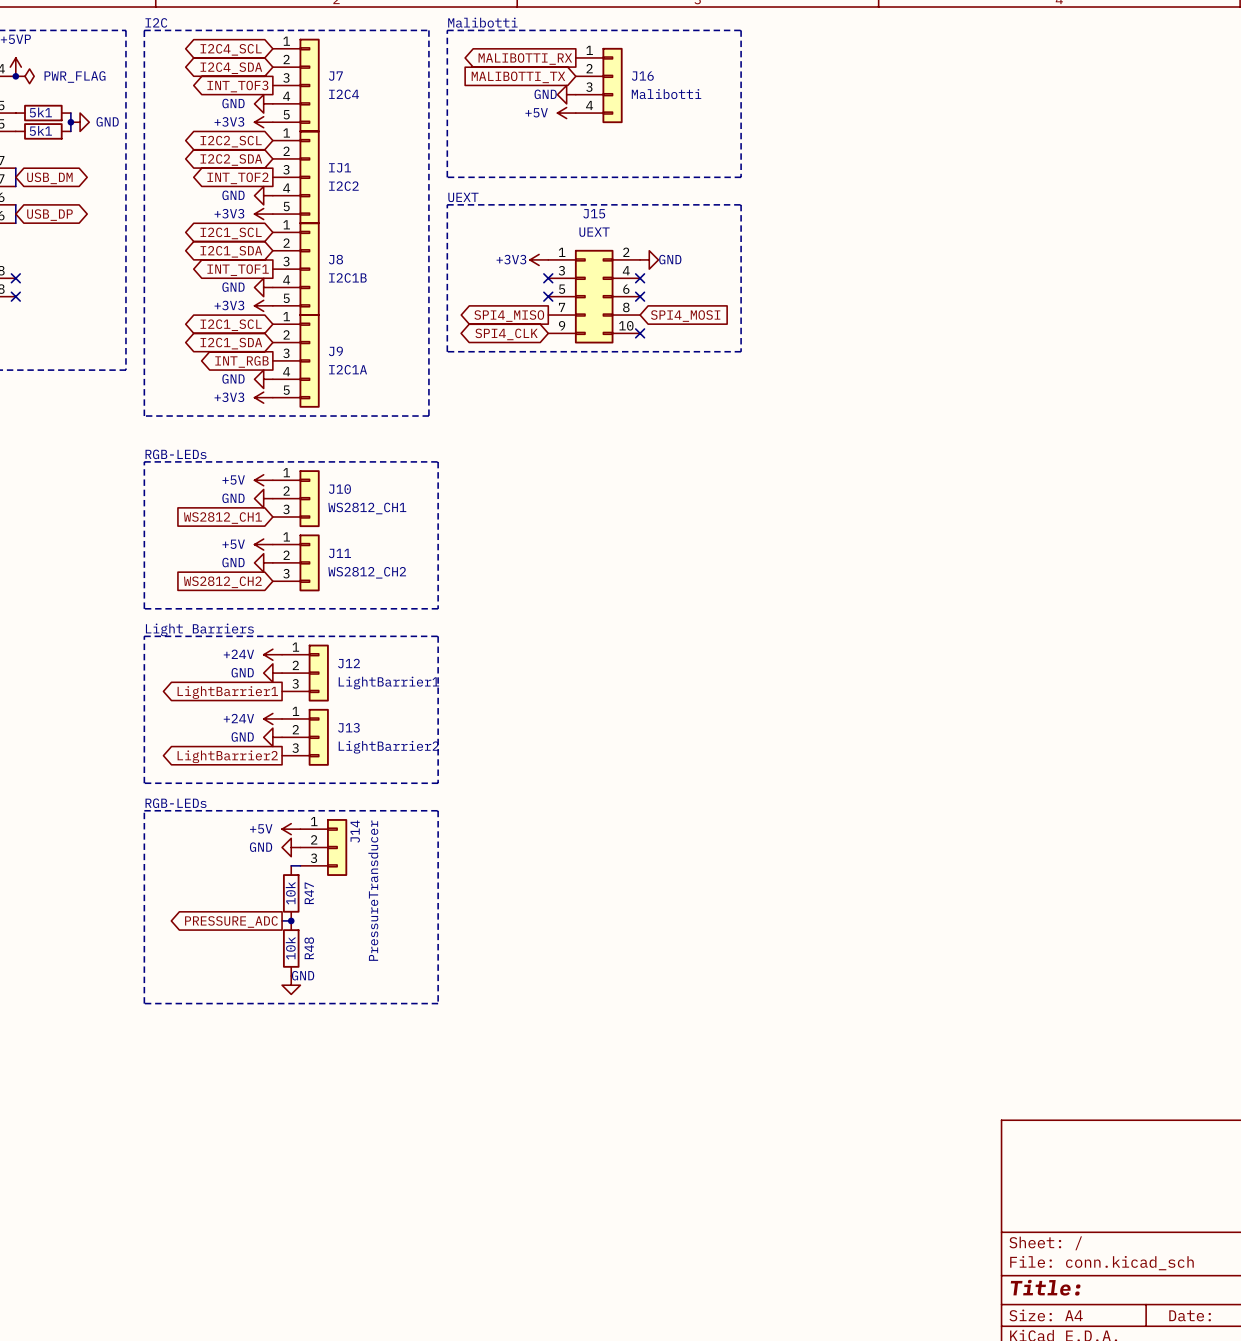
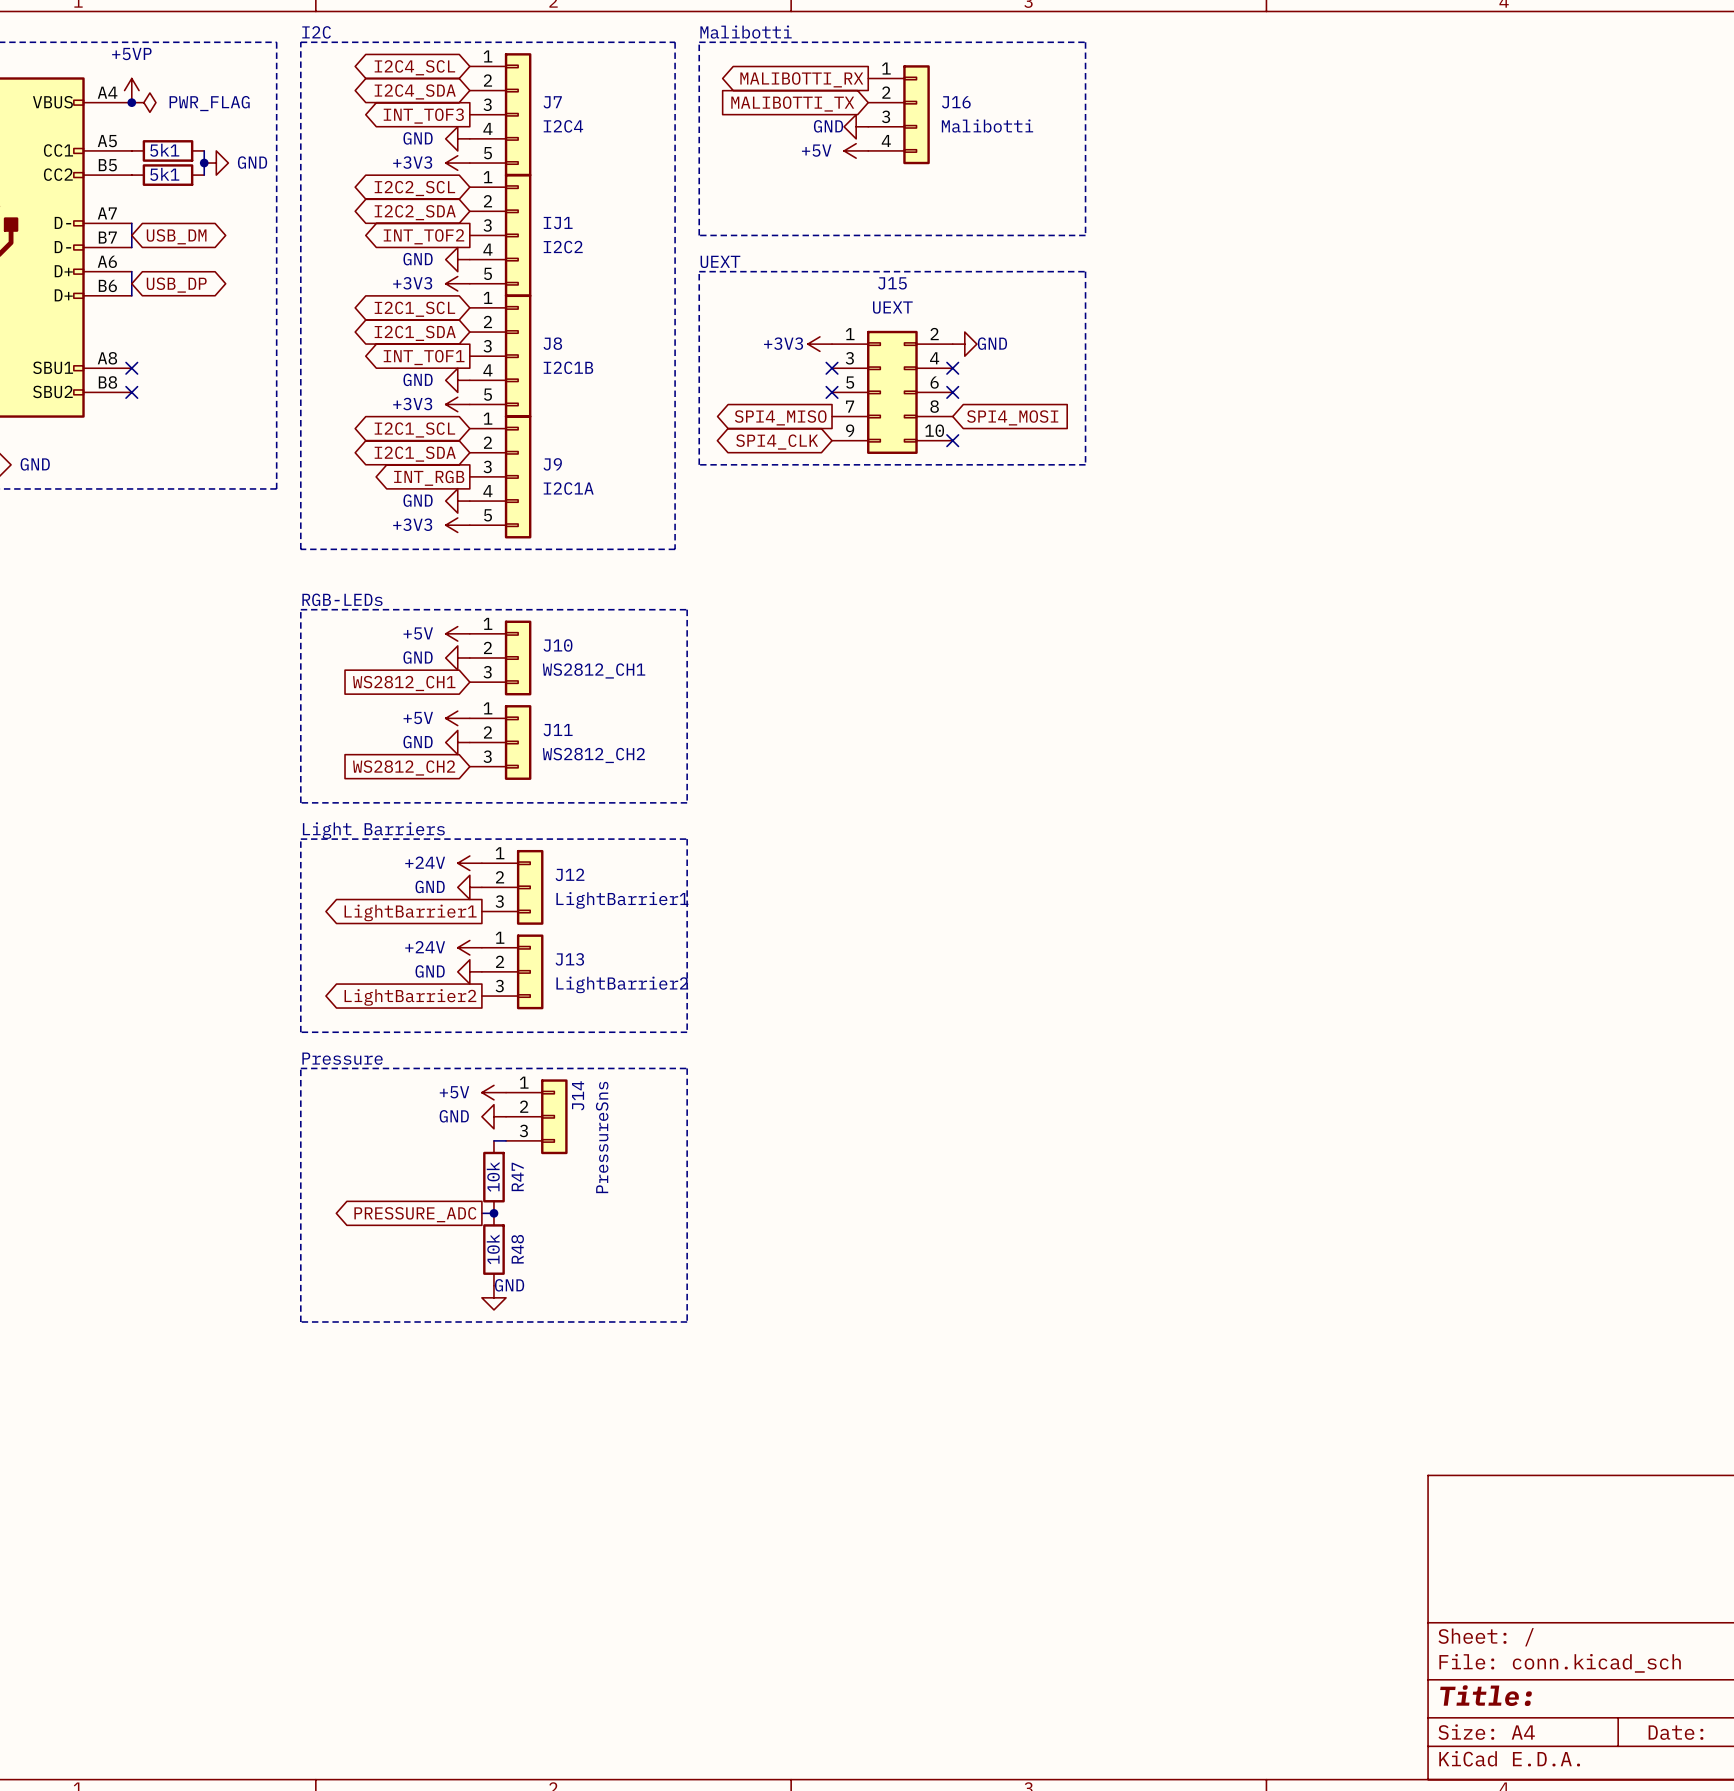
text: RGB-LEDs (176, 803) -> Pressure (342, 1058)
J14 value: PressureTransducer (373, 890) -> PressureSns (602, 1137)

